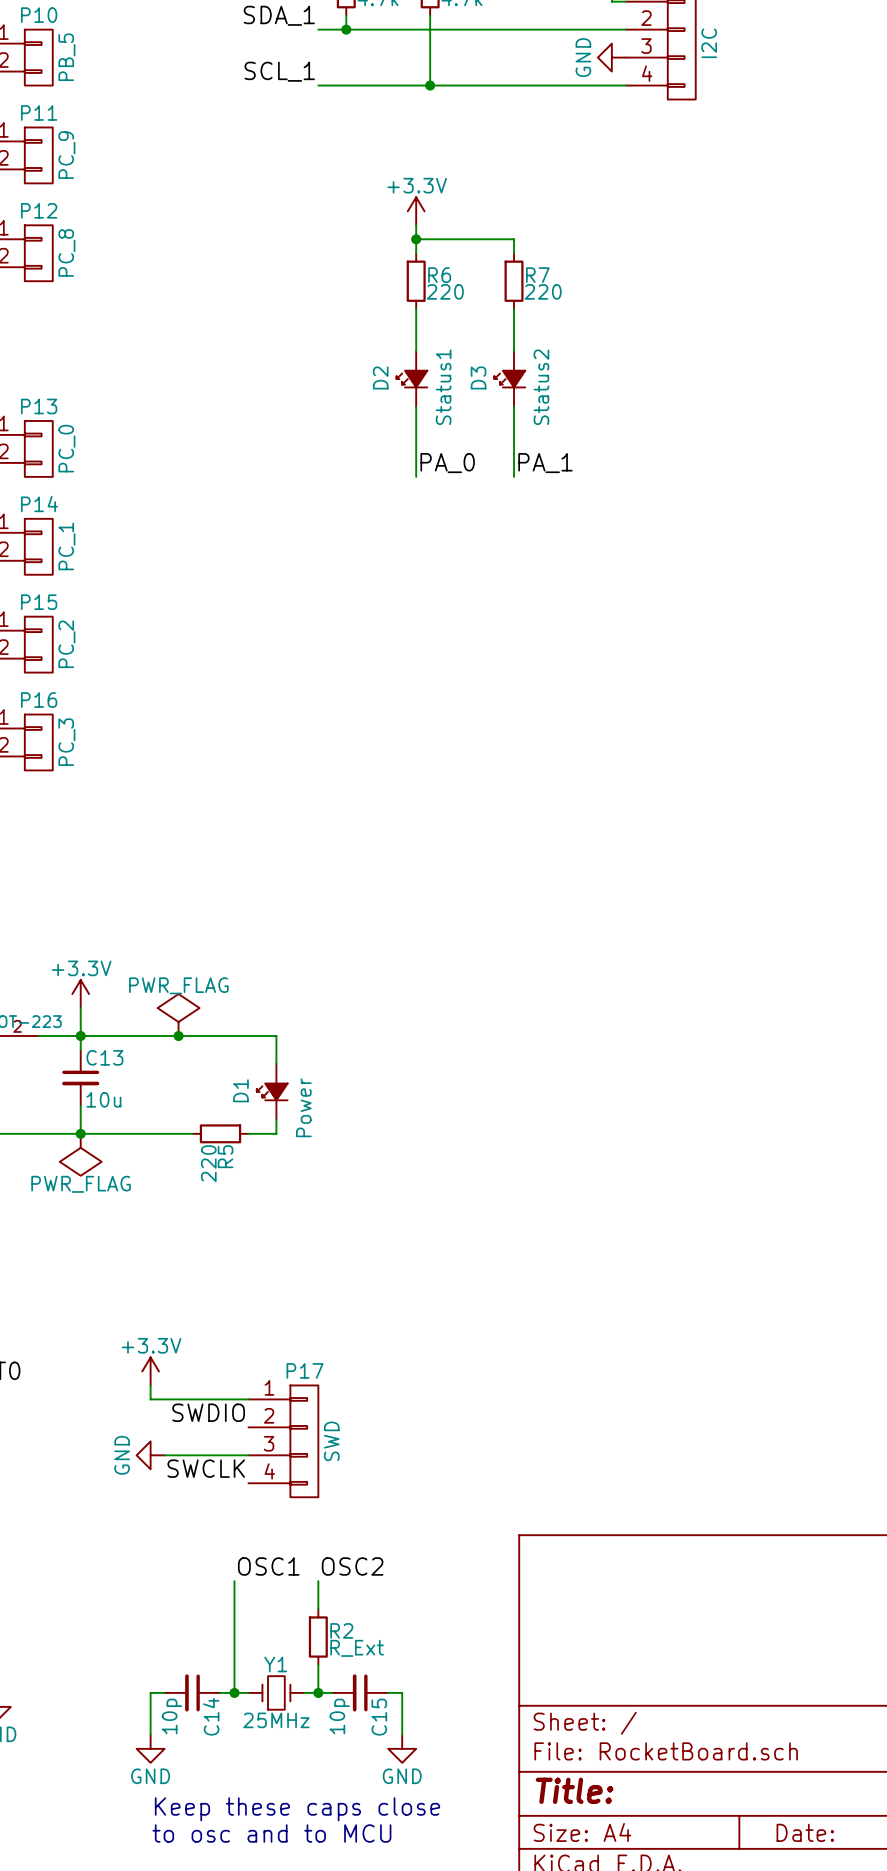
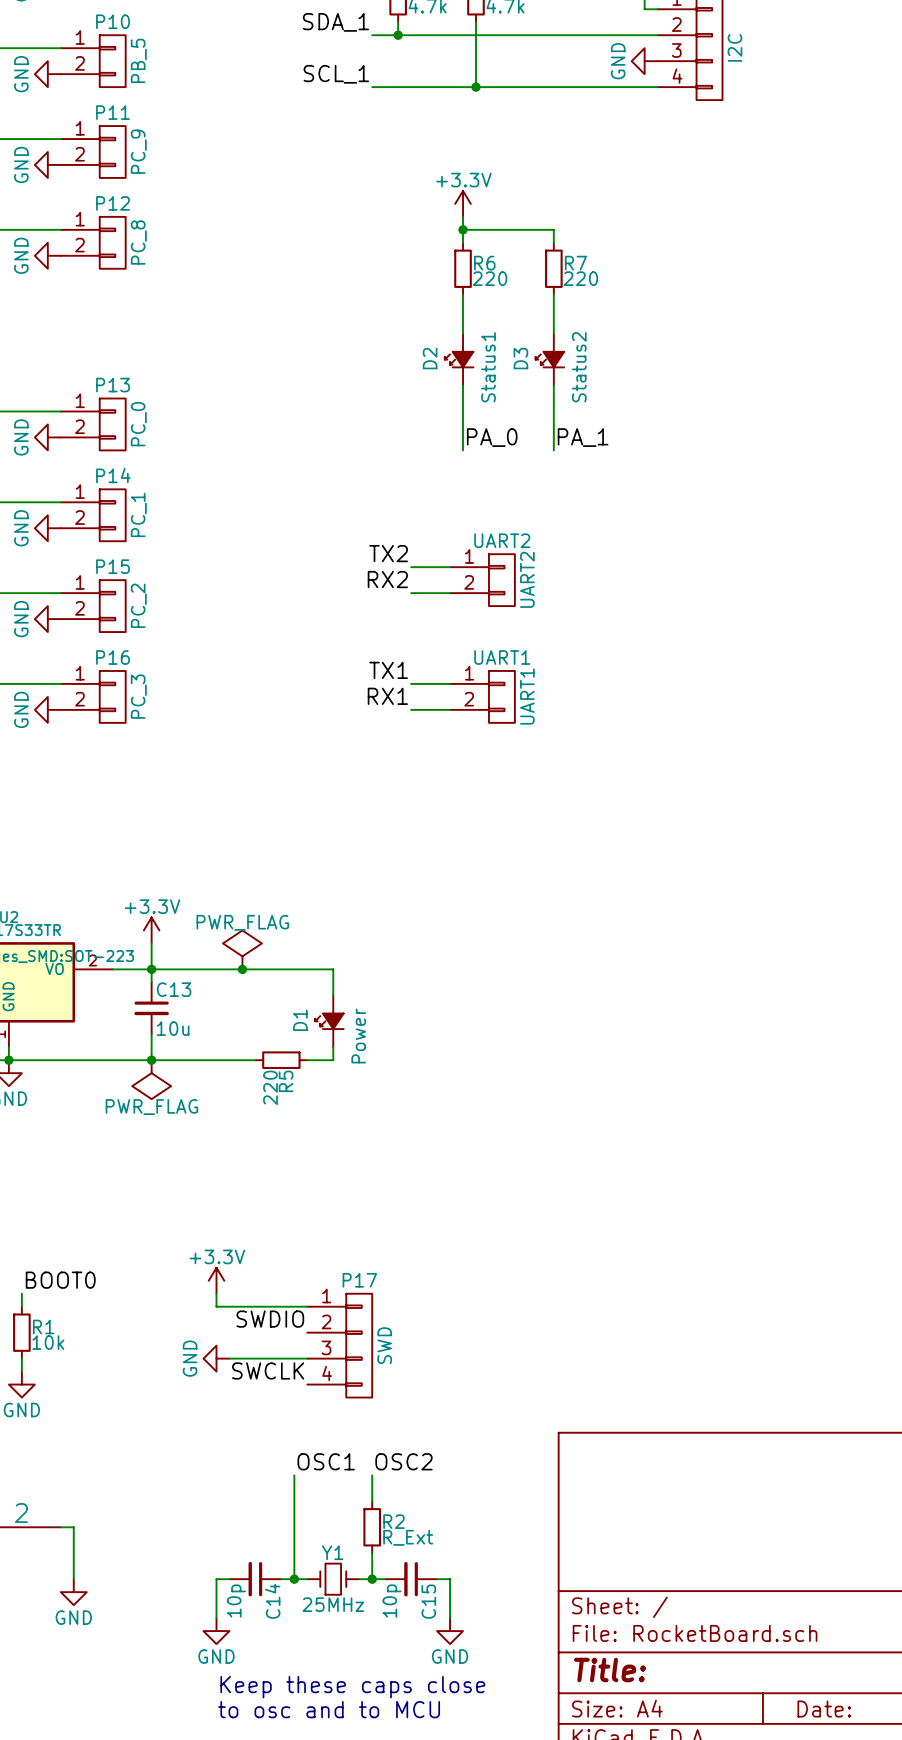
label: none -> TX2 (388, 553)
wire: none -> (411, 567) (450, 567)
label: none -> RX2 (387, 579)
UART2: none -> UART2 (482, 580)
wire: none -> (411, 593) (450, 593)
label: none -> TX1 (388, 670)
wire: none -> (411, 683) (450, 683)
label: none -> RX1 (387, 696)
UART1: none -> UART1 (482, 696)
wire: none -> (411, 709) (450, 709)

